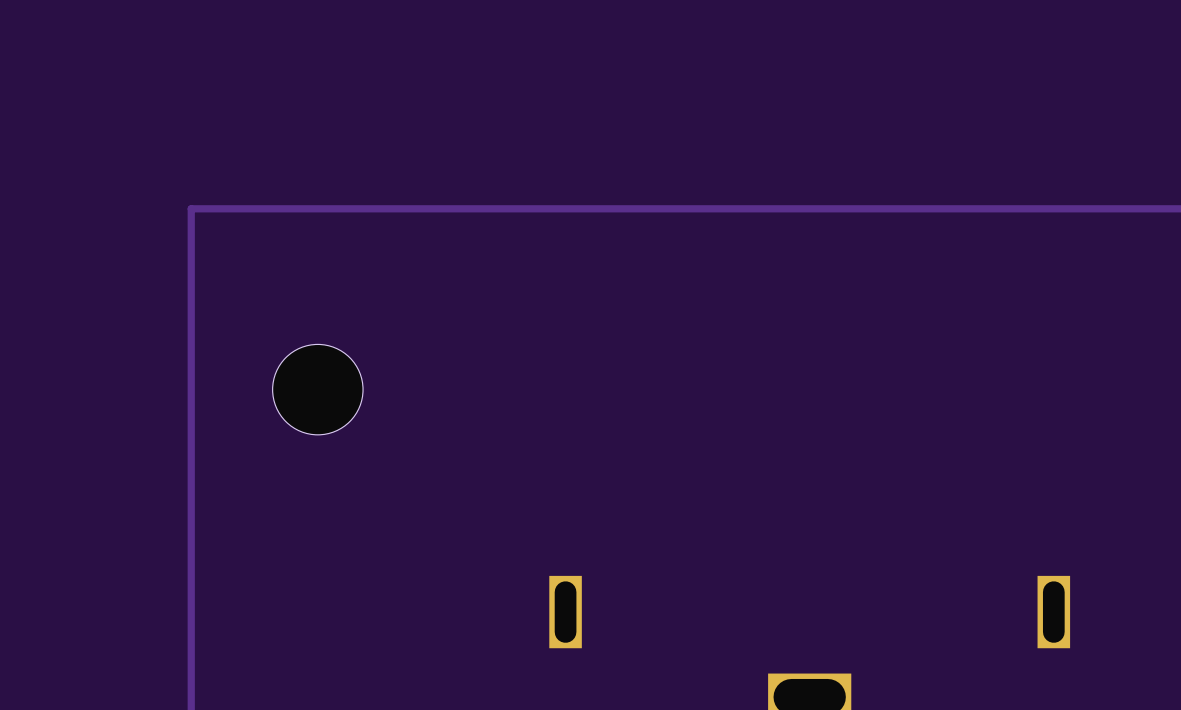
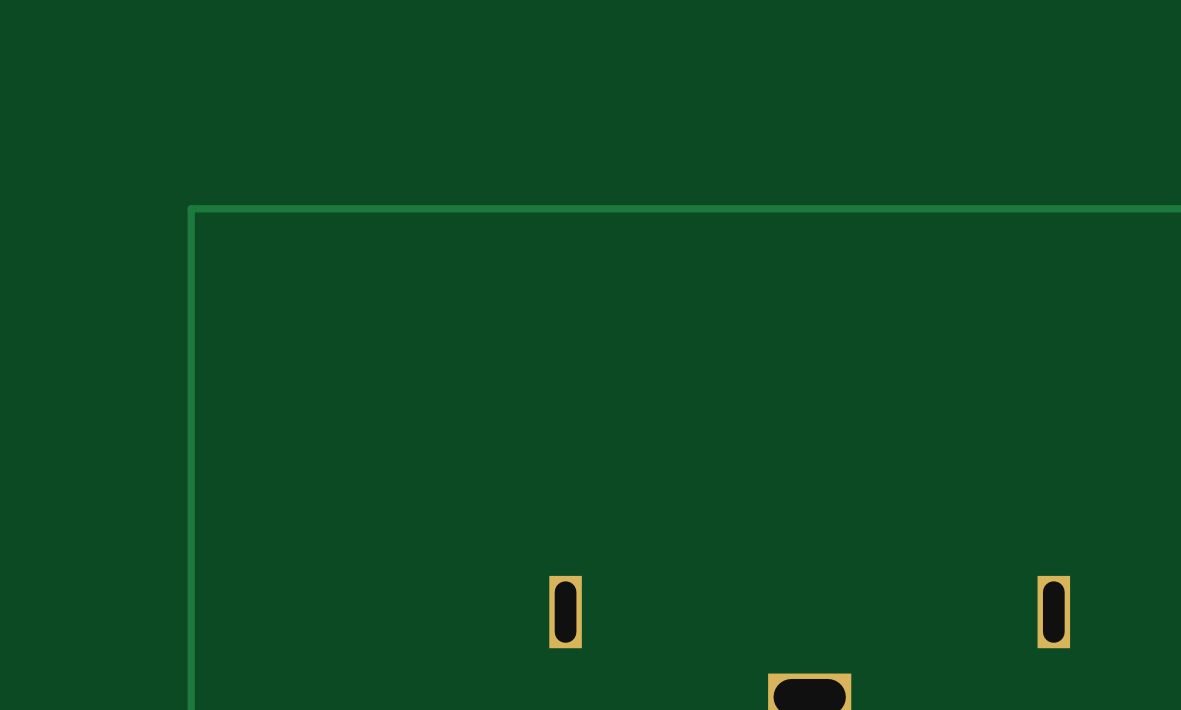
part: (317, 389) -> none

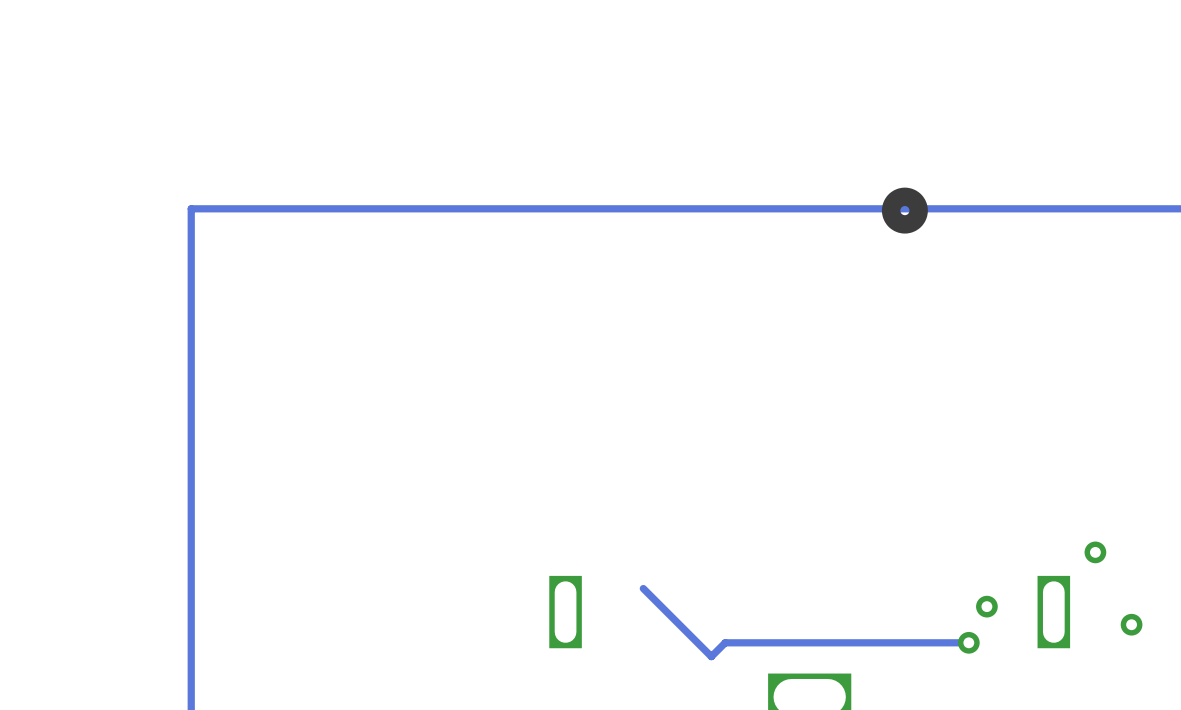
part: none -> (904, 210)
via: none -> (1095, 552)
track: none -> (643, 588) (711, 656) (725, 642) (968, 642)
via: none -> (986, 606)
via: none -> (1131, 624)
via: none -> (968, 642)

